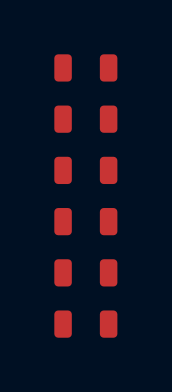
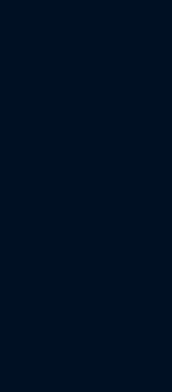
part: (85, 67) -> none
part: (85, 119) -> none
part: (85, 170) -> none
part: (85, 221) -> none
part: (85, 272) -> none
part: (85, 324) -> none

